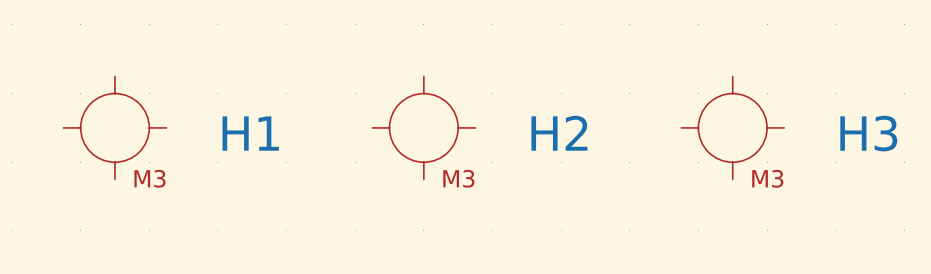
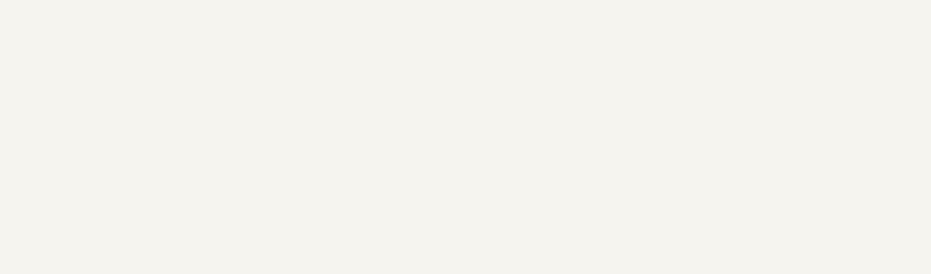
H1: (114, 127) -> none
H2: (423, 127) -> none
H3: (732, 127) -> none

